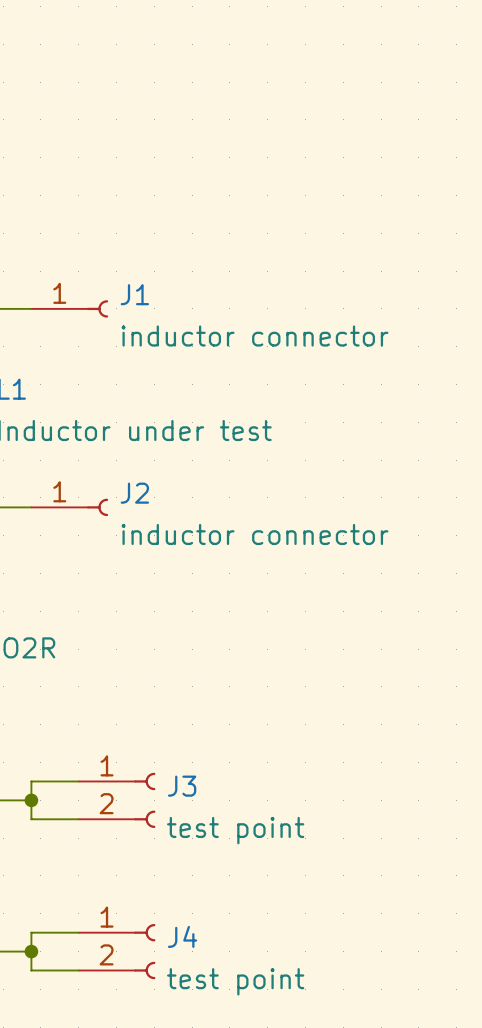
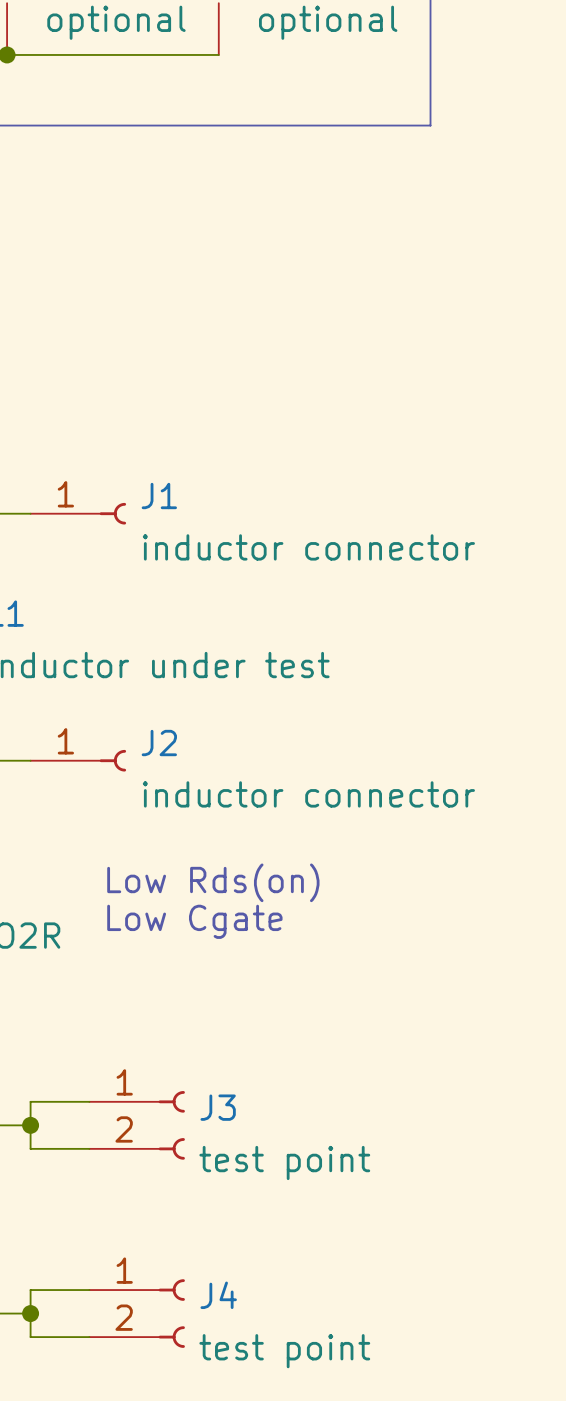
text: none -> Low Rds(on) (213, 882)
text: none -> Low Cgate (194, 921)

